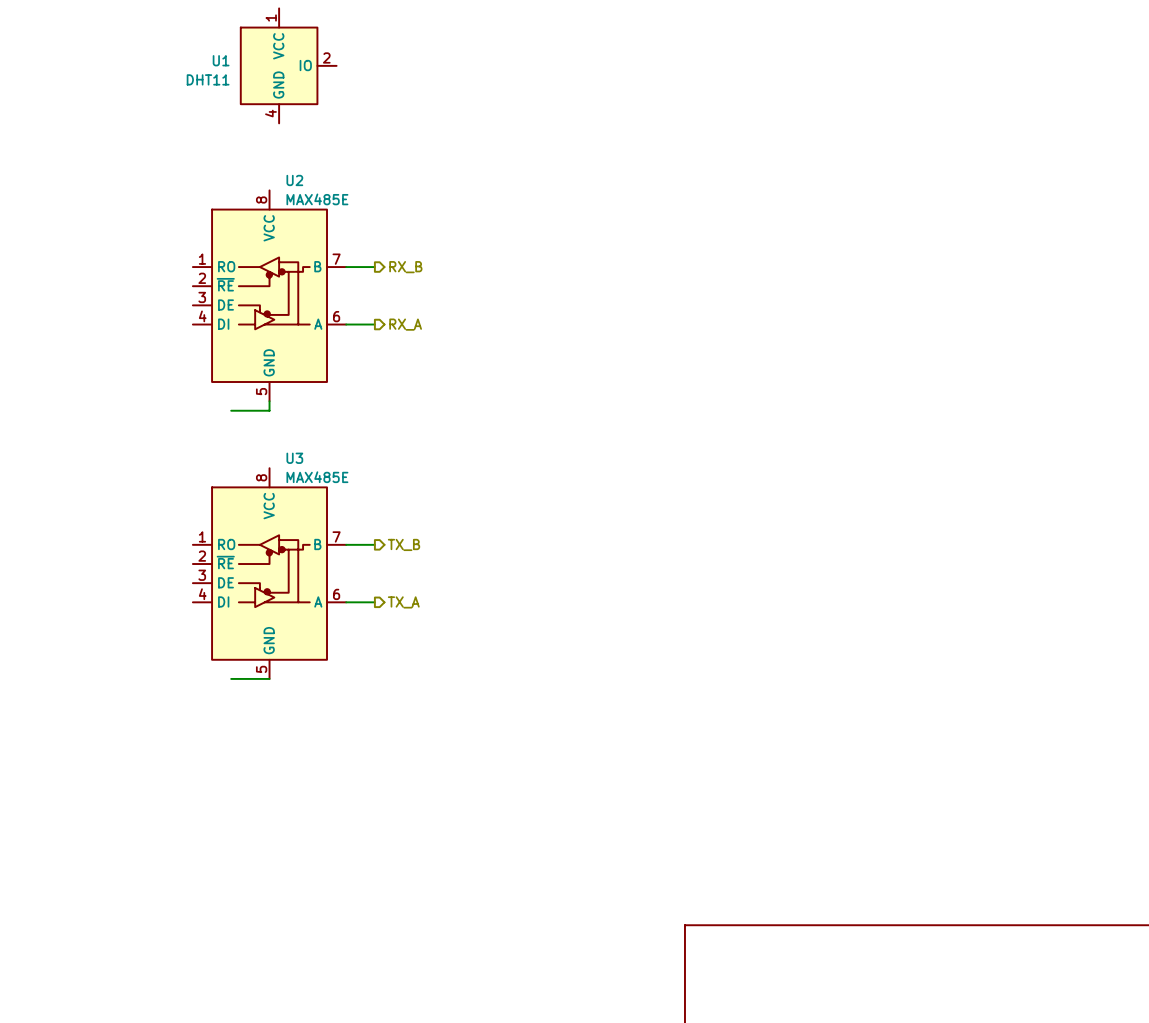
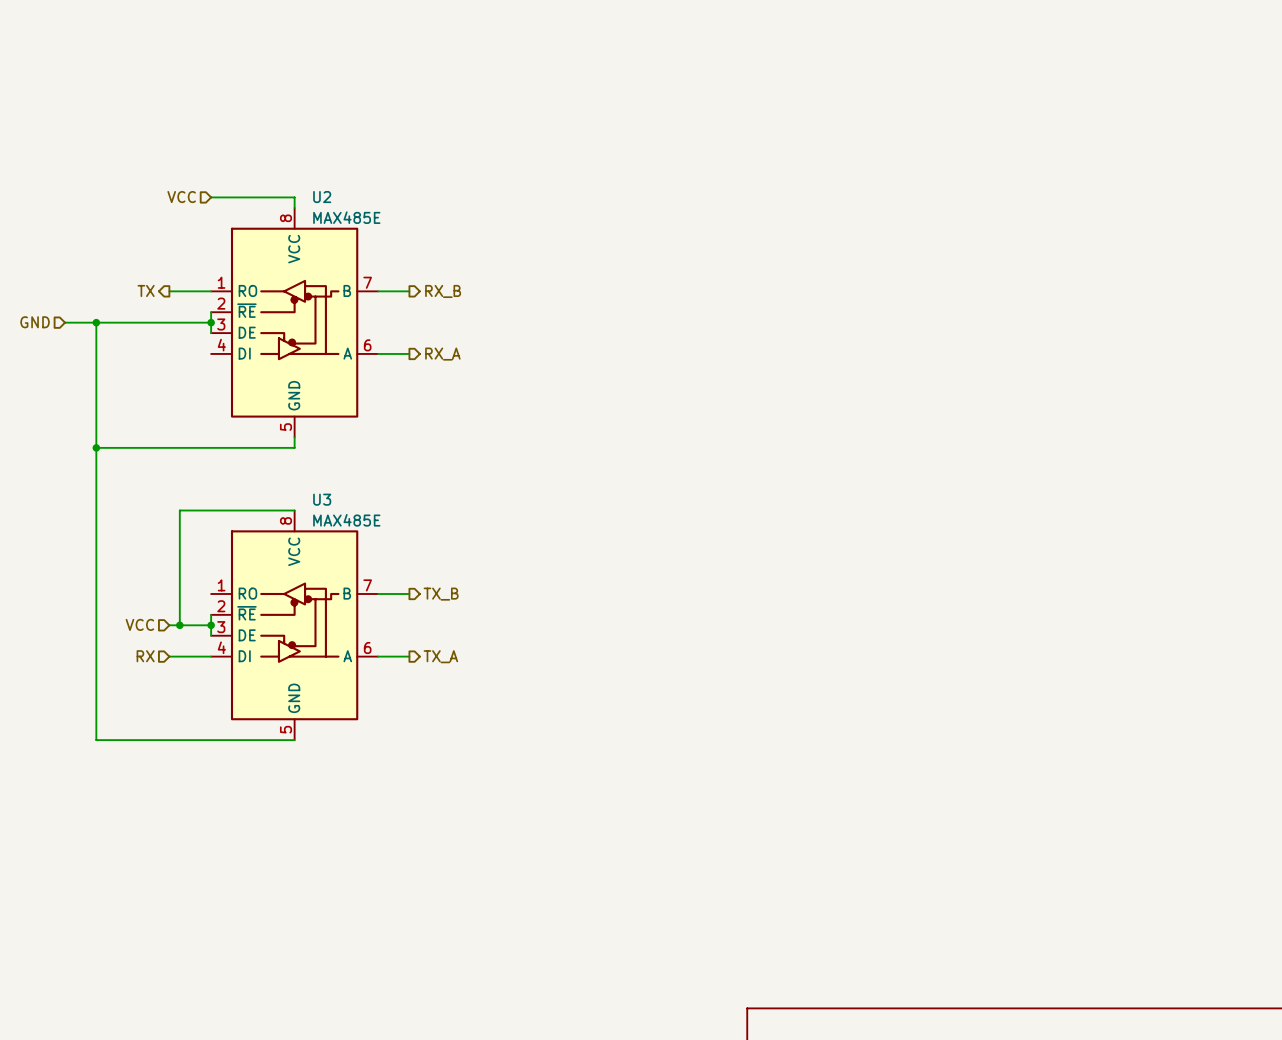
U1: DHT11 (288, 65) -> none
hierarchical label: none -> VCC (181, 197)
wire: none -> (211, 197) (294, 197) (294, 207)
hierarchical label: none -> TX (146, 290)
wire: none -> (169, 291) (211, 291)
wire: none -> (211, 312) (211, 333)
hierarchical label: none -> GND (35, 322)
wire: none -> (65, 322) (211, 322)
wire: none -> (96, 322) (96, 740) (252, 740)
junction: none -> (96, 322)
junction: none -> (211, 322)
wire: none -> (96, 447) (252, 447)
junction: none -> (96, 447)
wire: none -> (294, 510) (179, 510) (179, 625)
wire: none -> (211, 614) (211, 635)
hierarchical label: none -> VCC (139, 624)
wire: none -> (169, 625) (211, 625)
junction: none -> (179, 625)
junction: none -> (211, 625)
hierarchical label: none -> RX (145, 656)
wire: none -> (169, 656) (211, 656)

